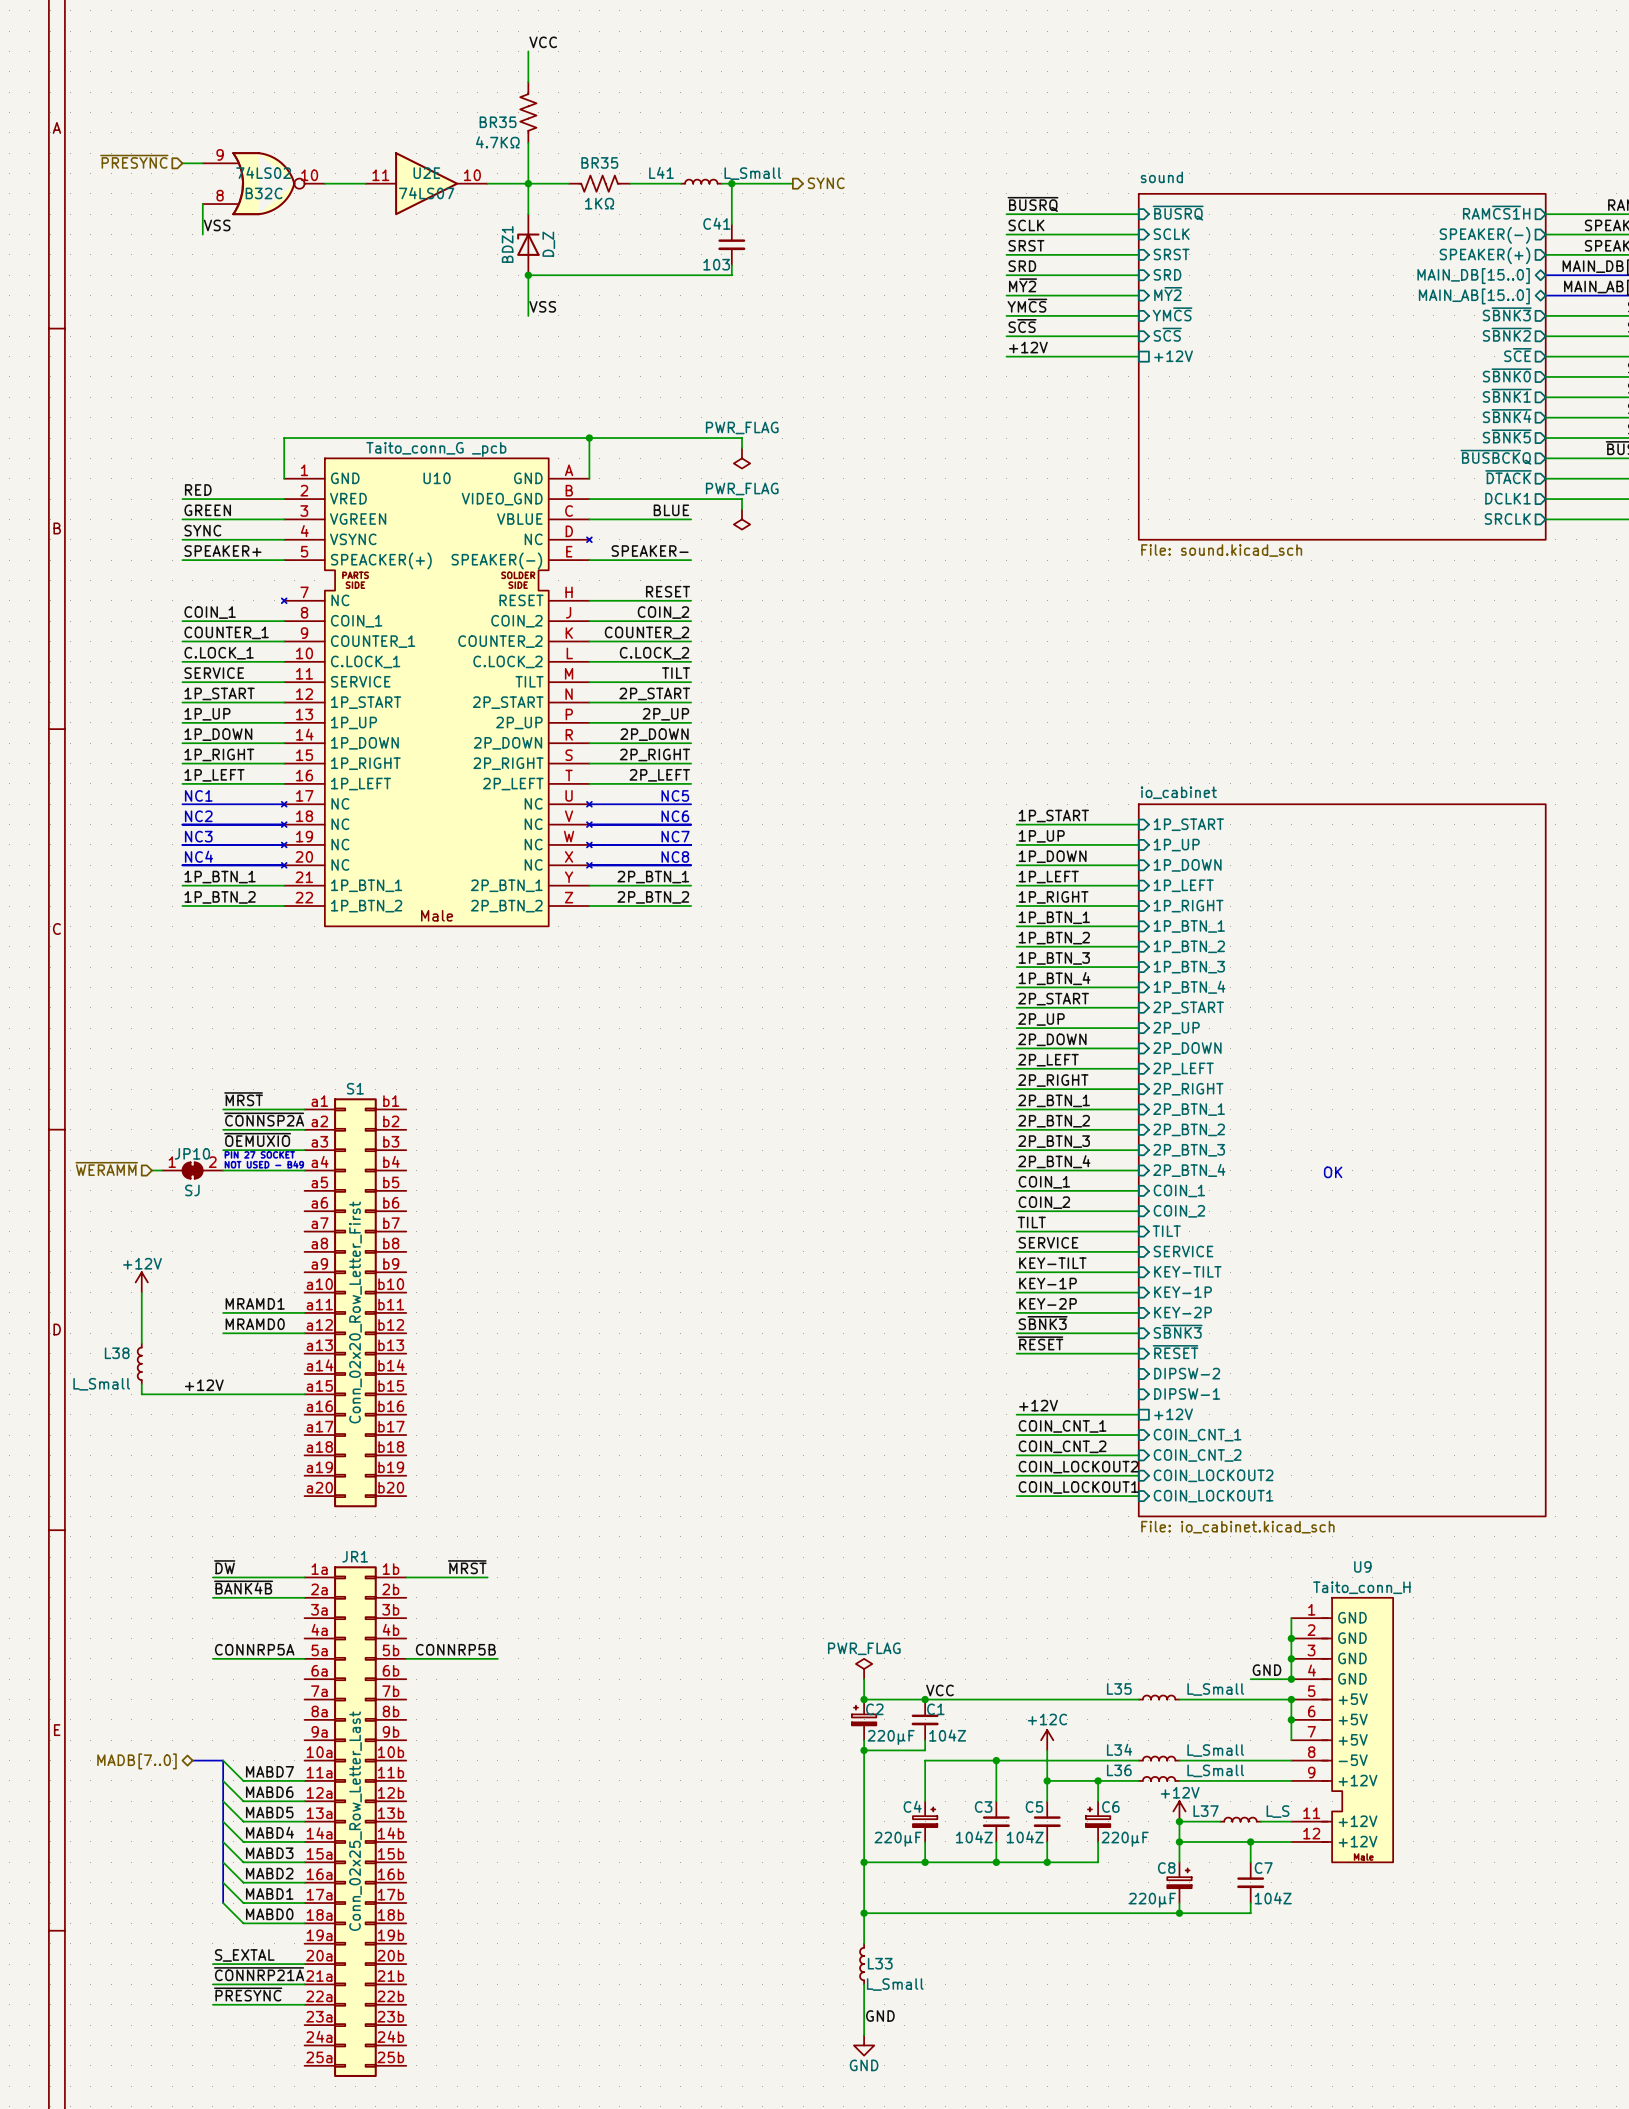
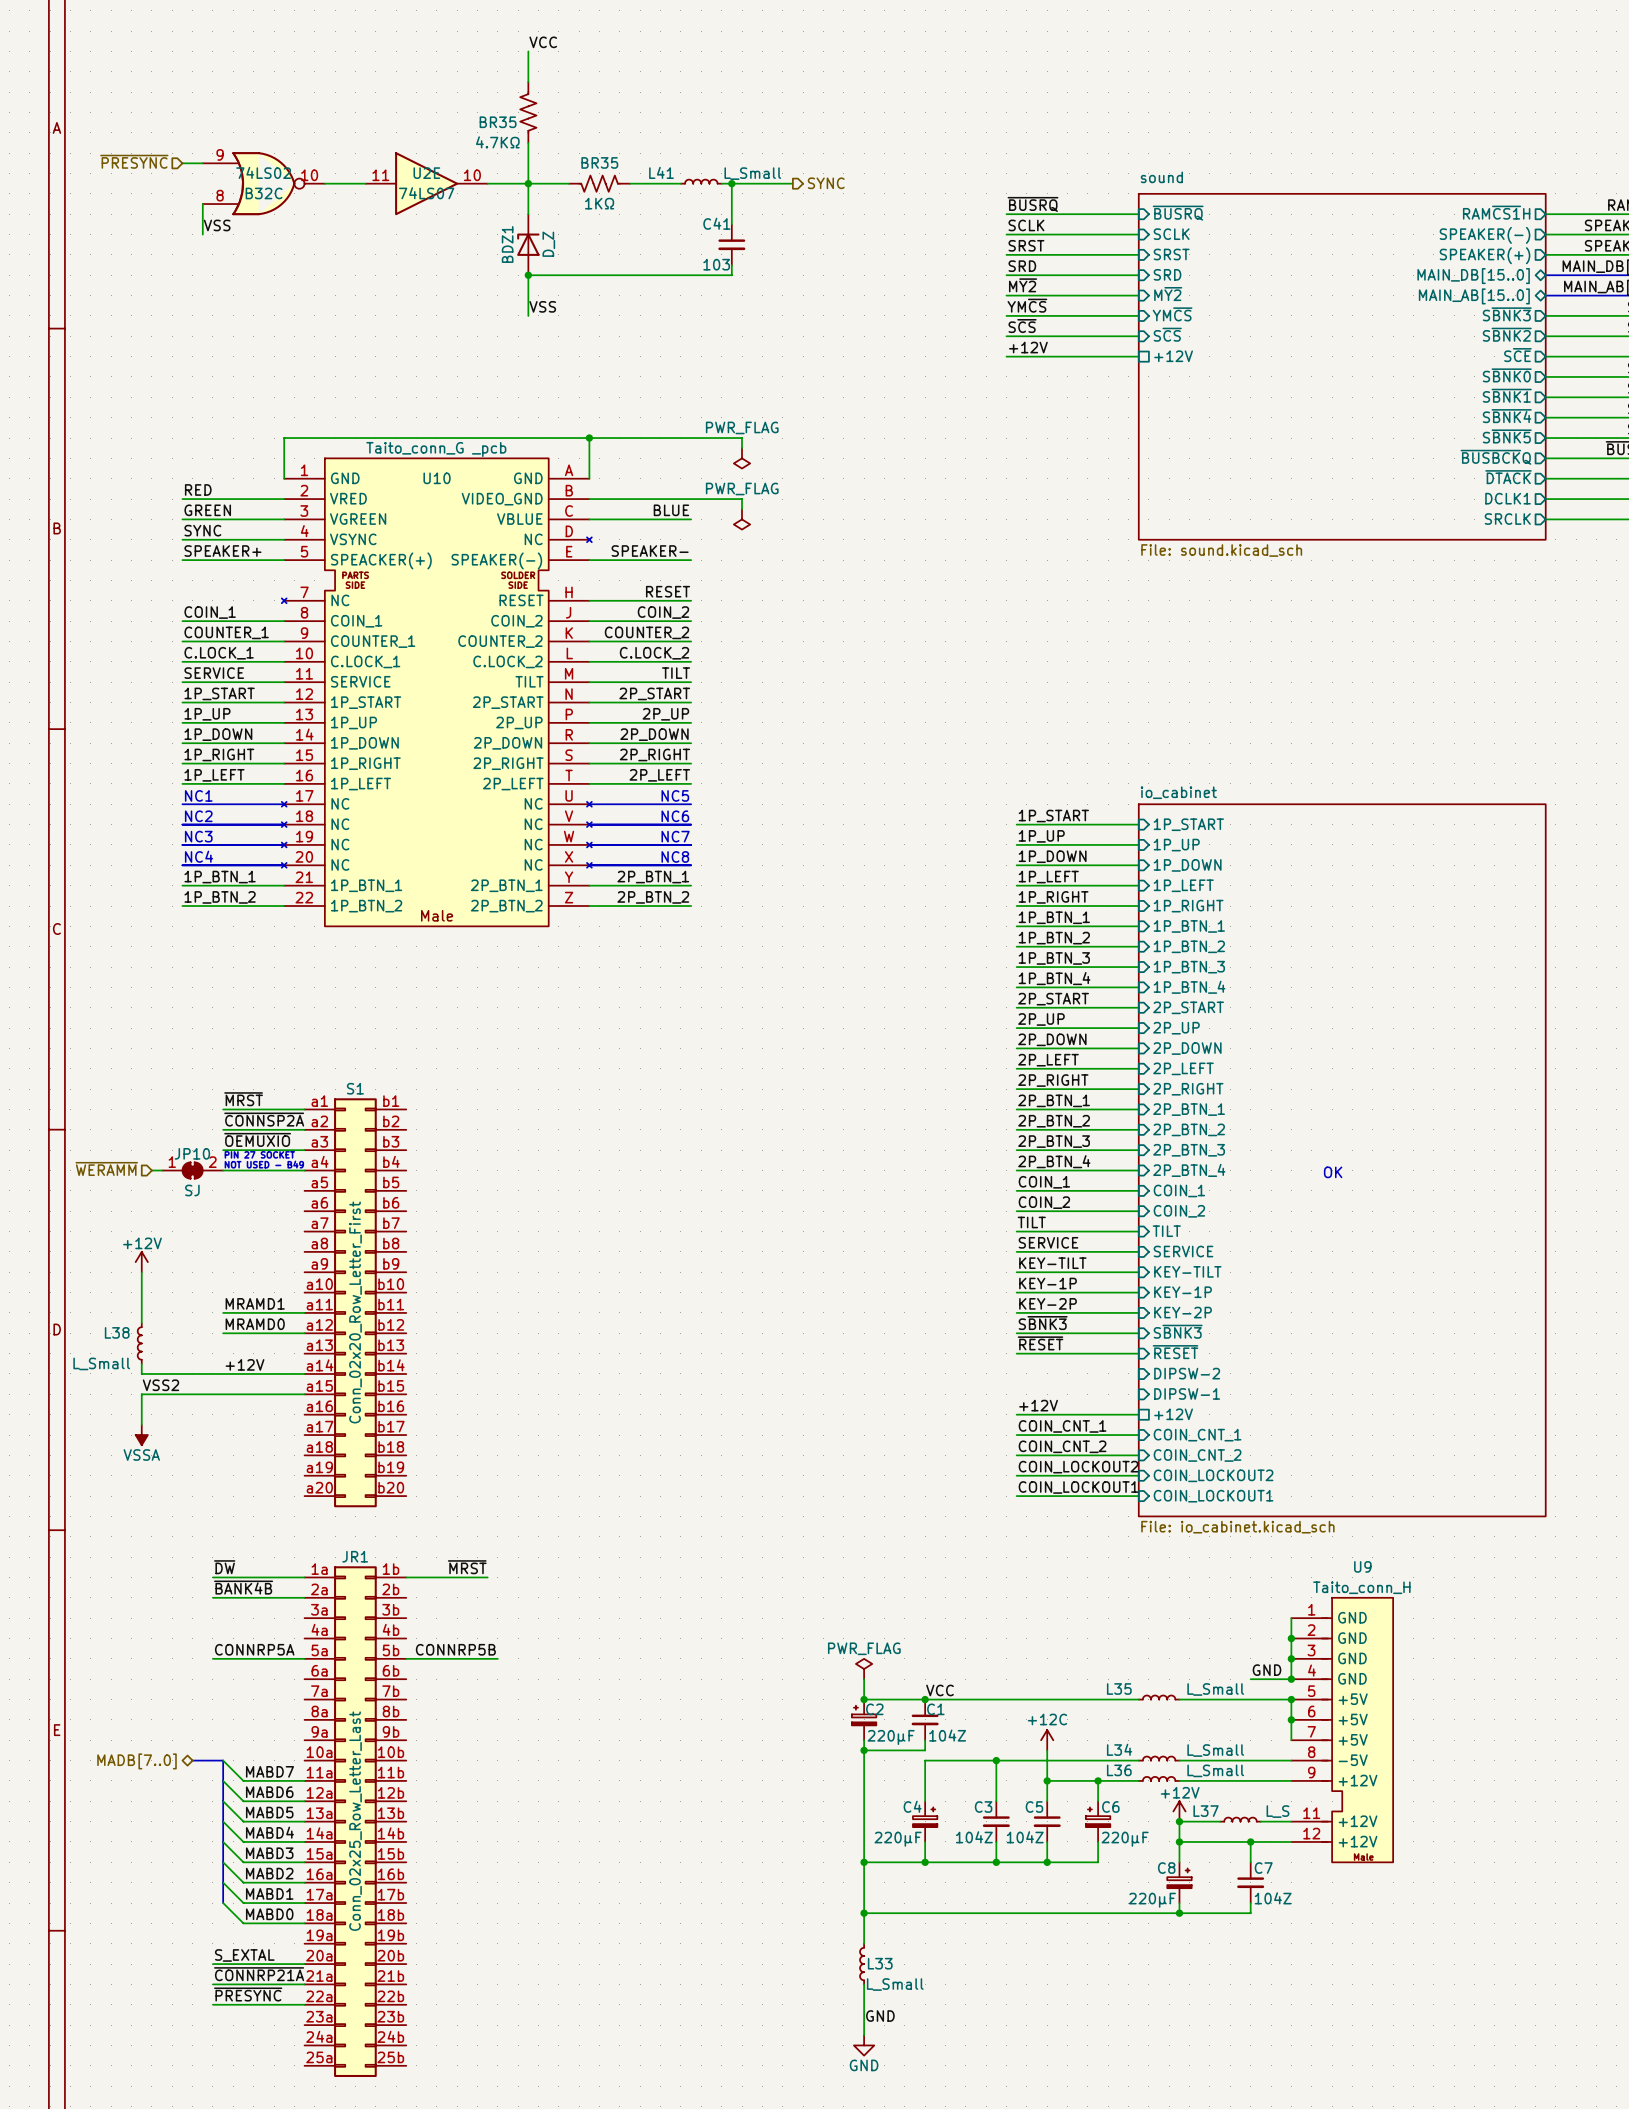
power symbol position: +12V (141, 1282) -> +12V (141, 1262)
L38 position: (139, 1363) -> (139, 1343)
wire: none -> (141, 1363) (141, 1373) (304, 1373)
wire: (141, 1384) (141, 1394) -> (141, 1424) (141, 1394)
label: none -> VSS2 (160, 1385)
label position: +12V (204, 1385) -> +12V (245, 1364)
power symbol: none -> VSSA (141, 1435)

